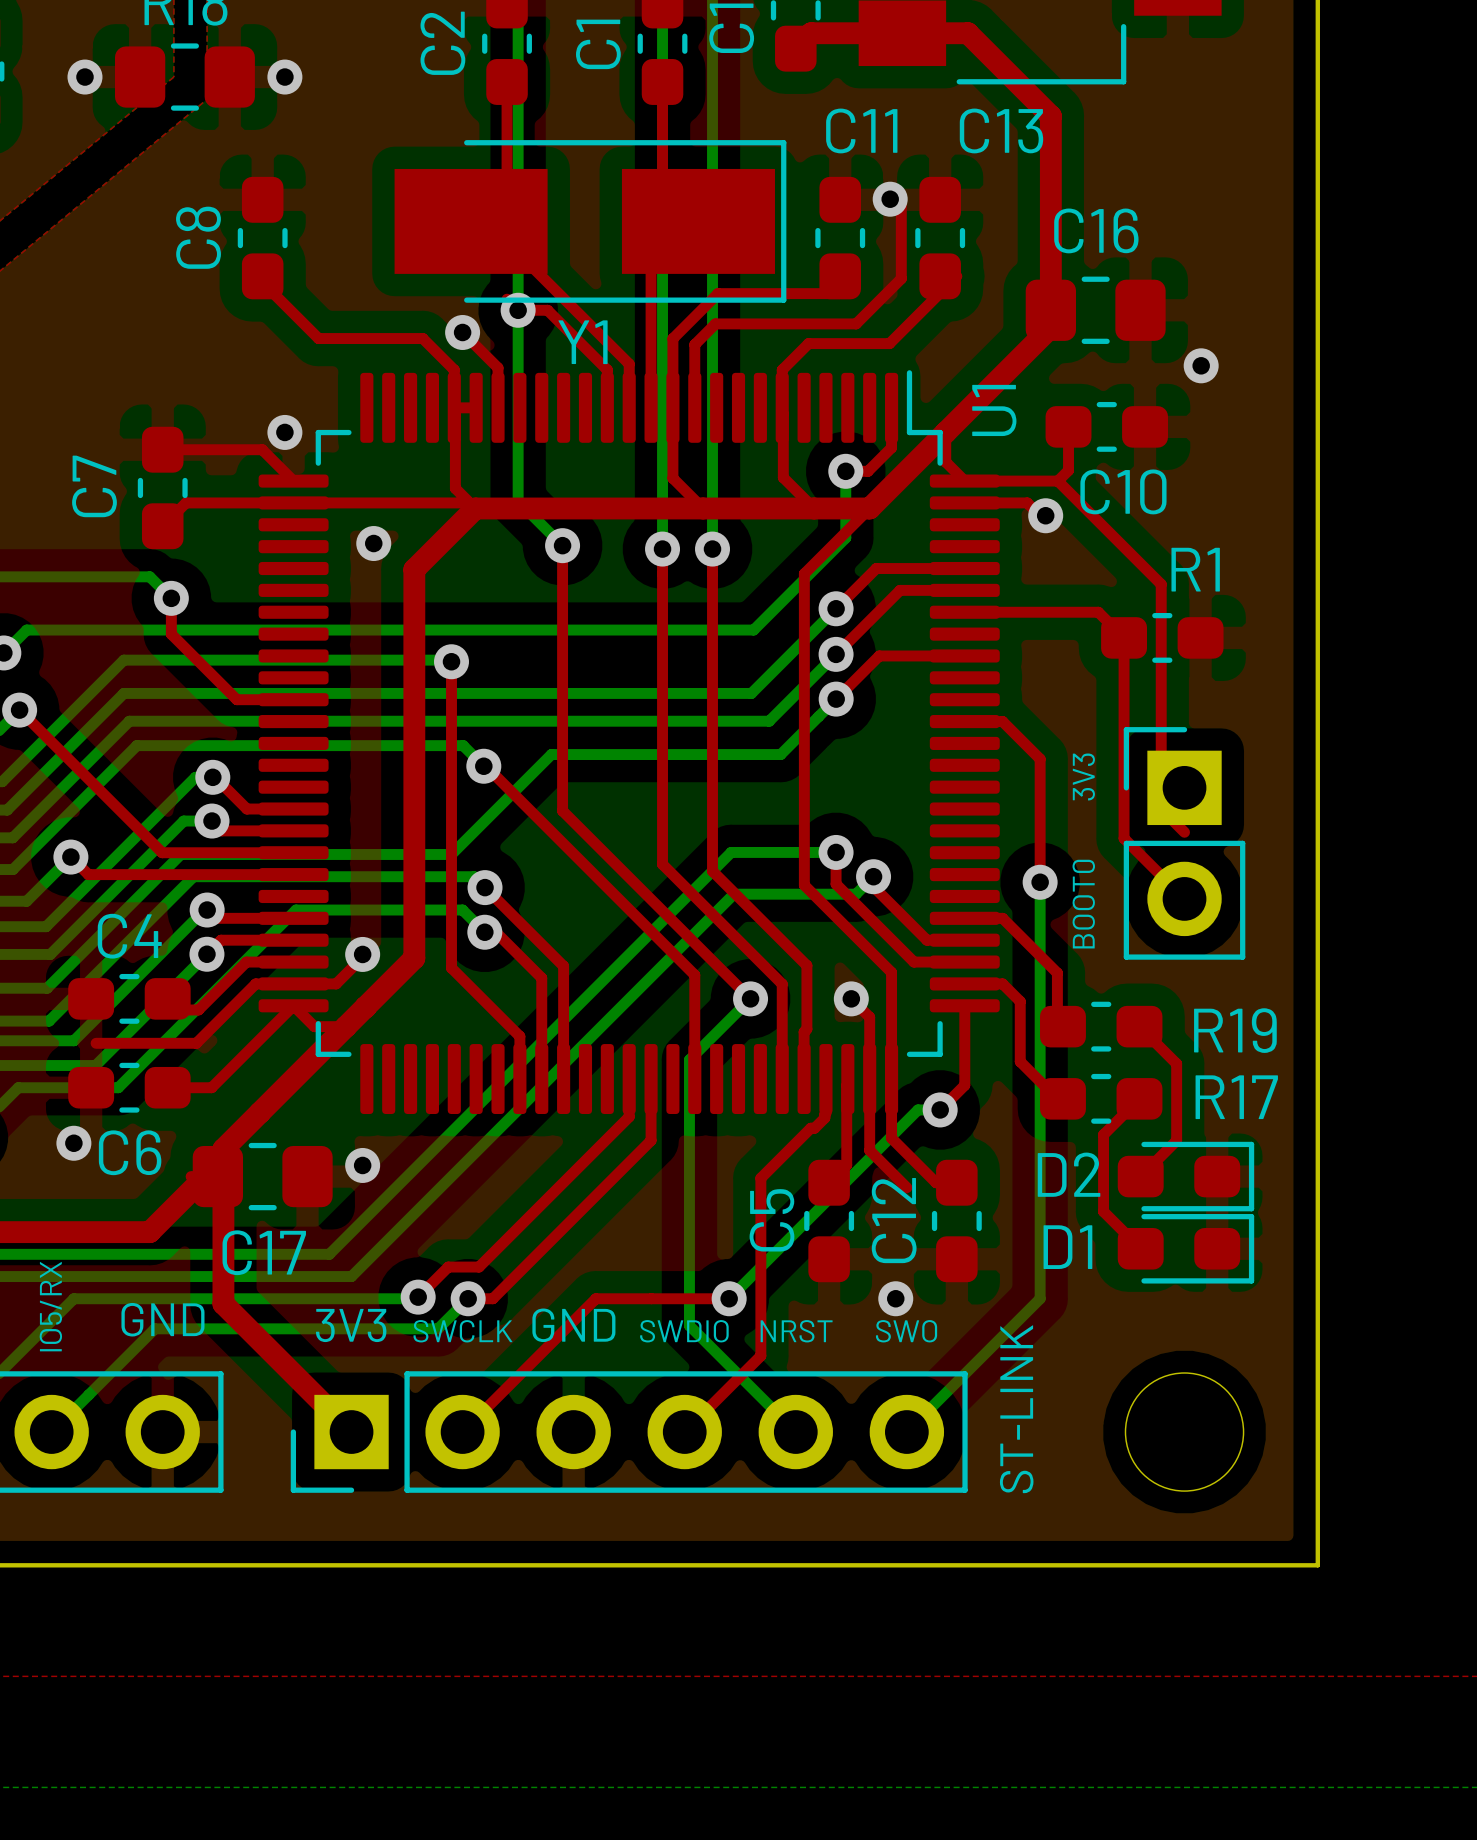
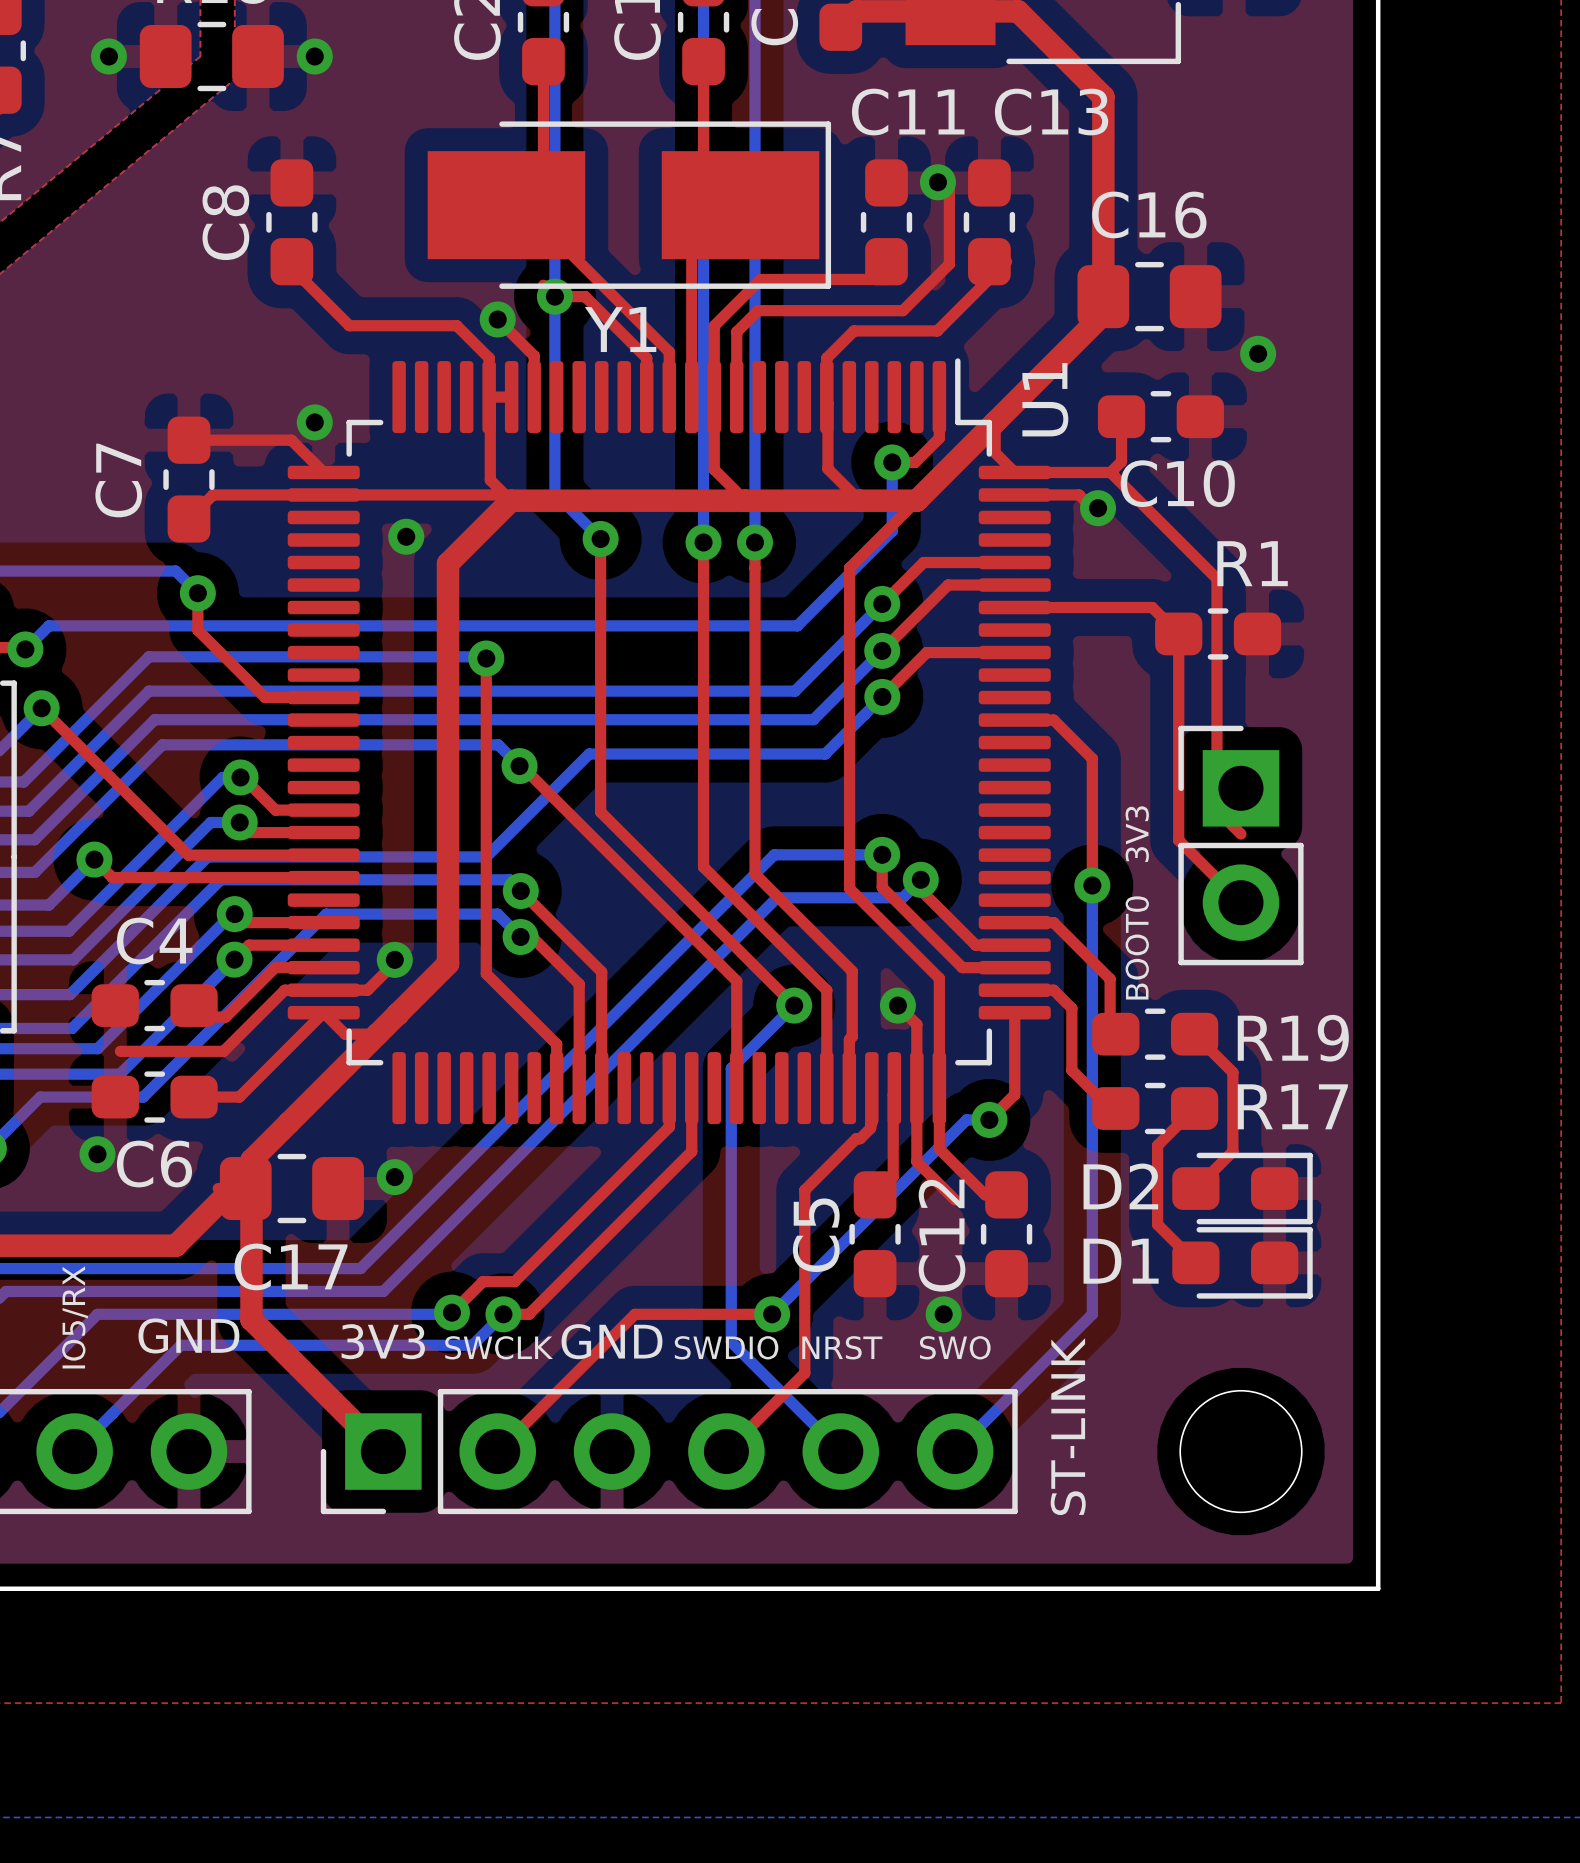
text position: 3V3 (1083, 776) -> 3V3 (1137, 834)
text position: BOOT0 (1083, 904) -> BOOT0 (1137, 947)

